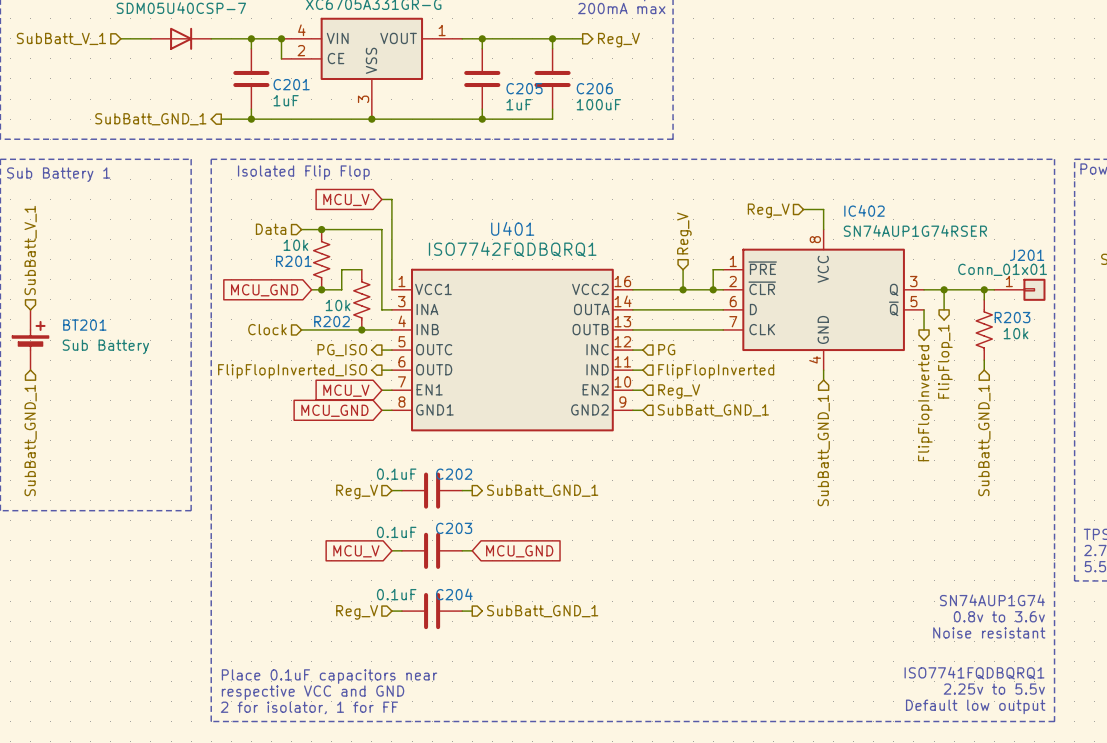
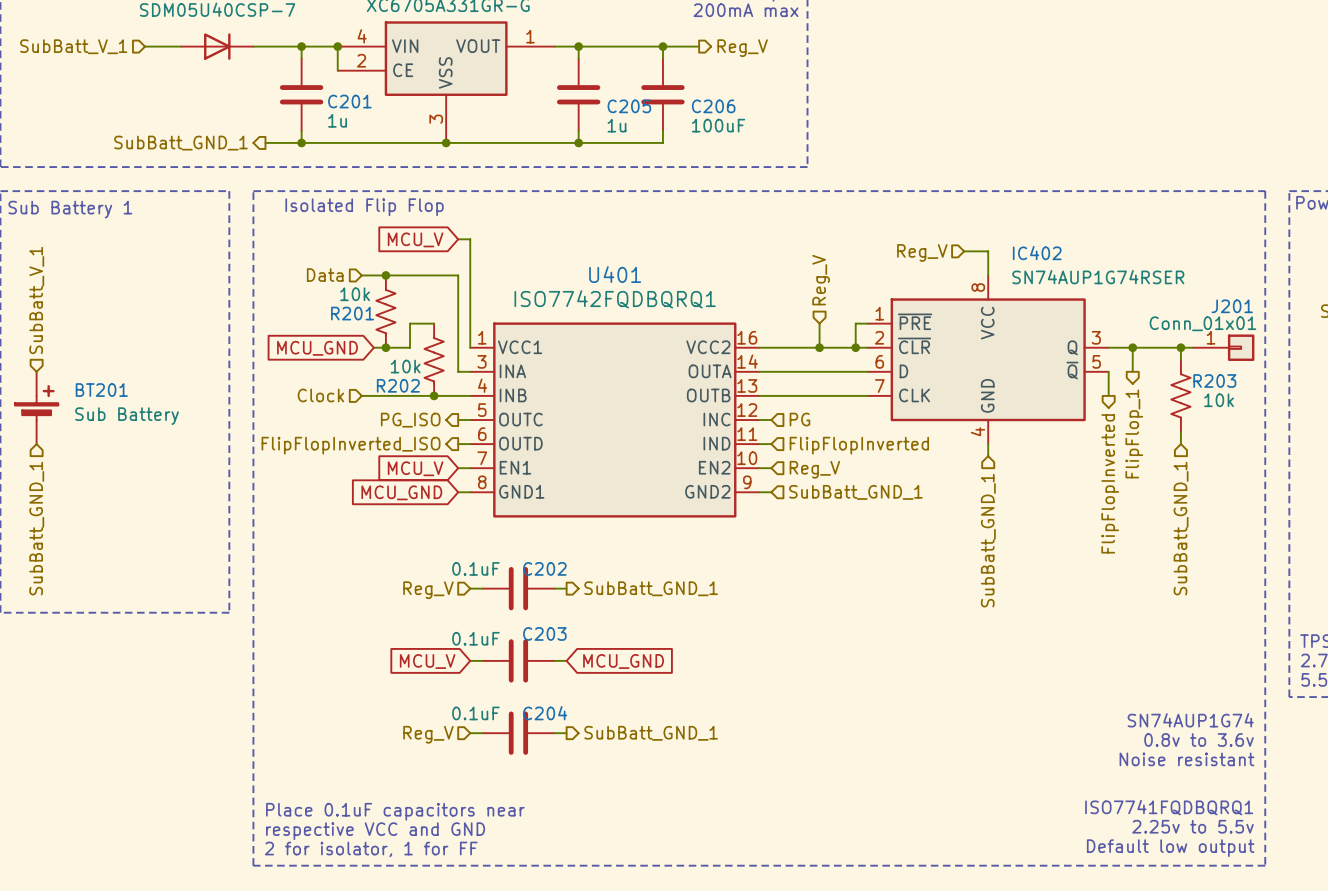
C201 value: 1uF (286, 100) -> 1u (337, 120)
C205 value: 1uF (519, 104) -> 1u (617, 125)

